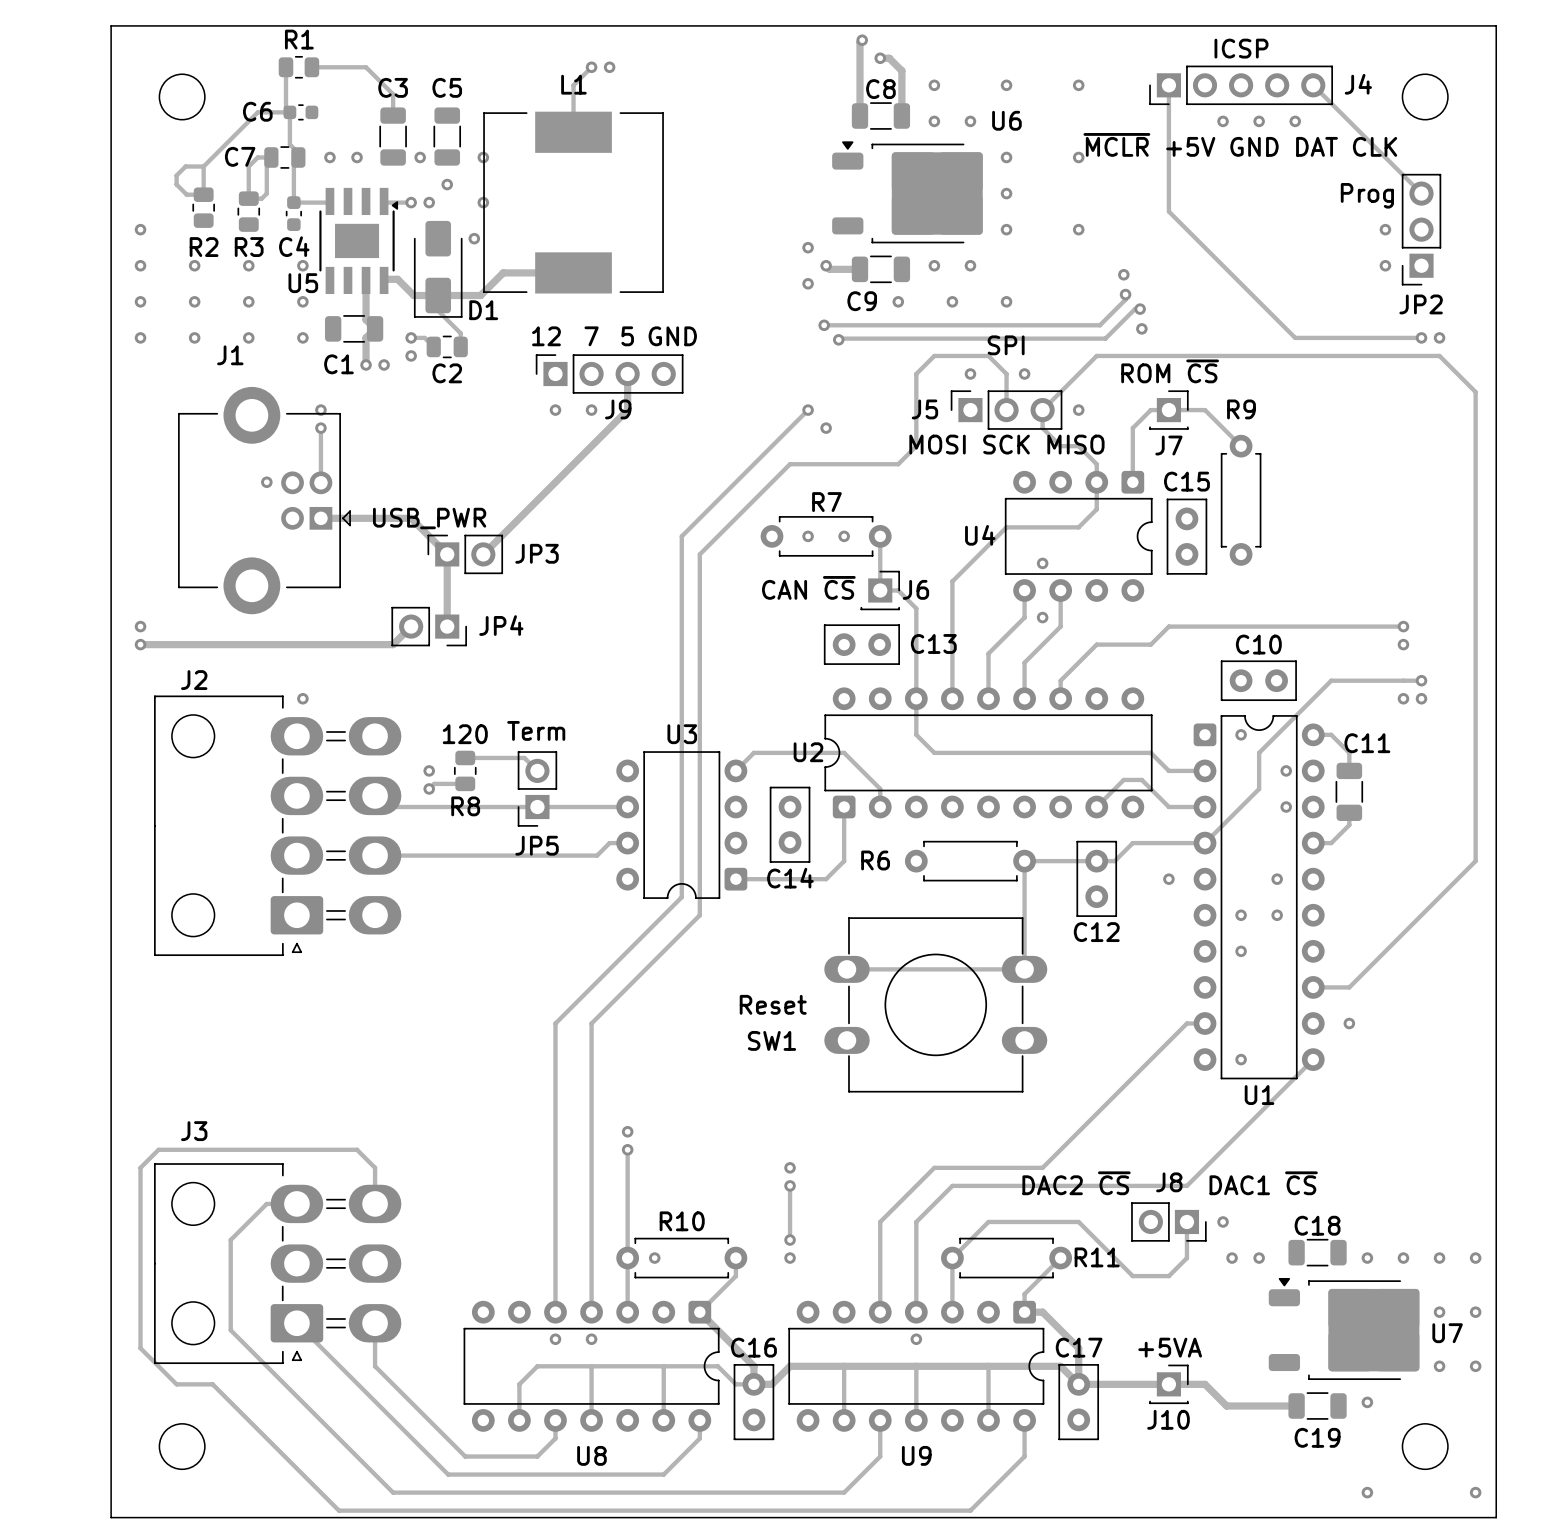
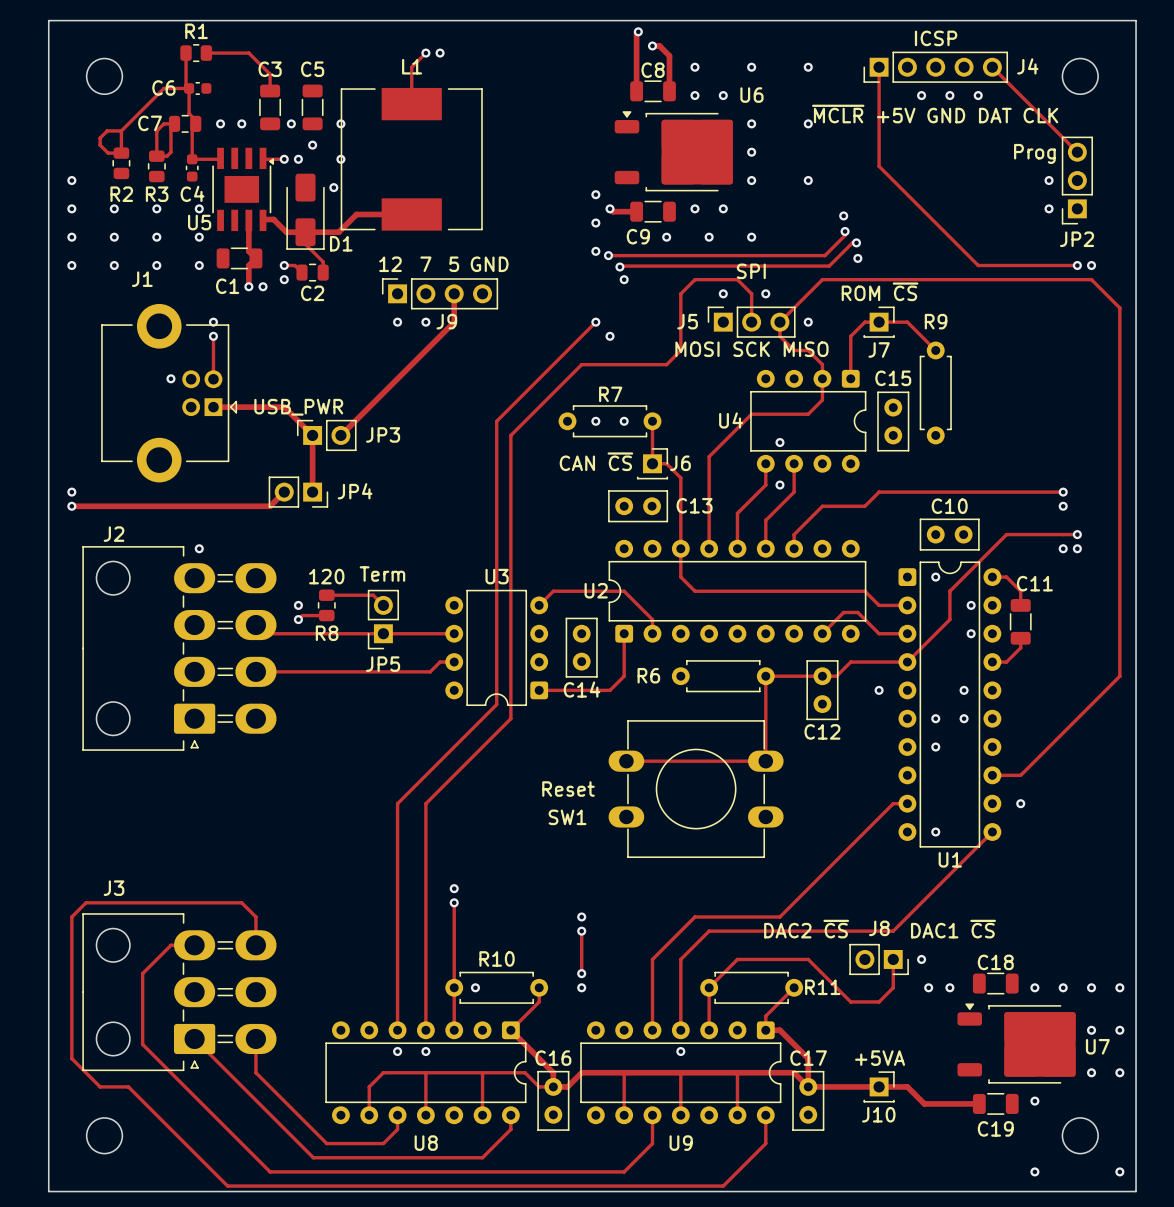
via: none -> (595, 251)
via: none -> (624, 279)

